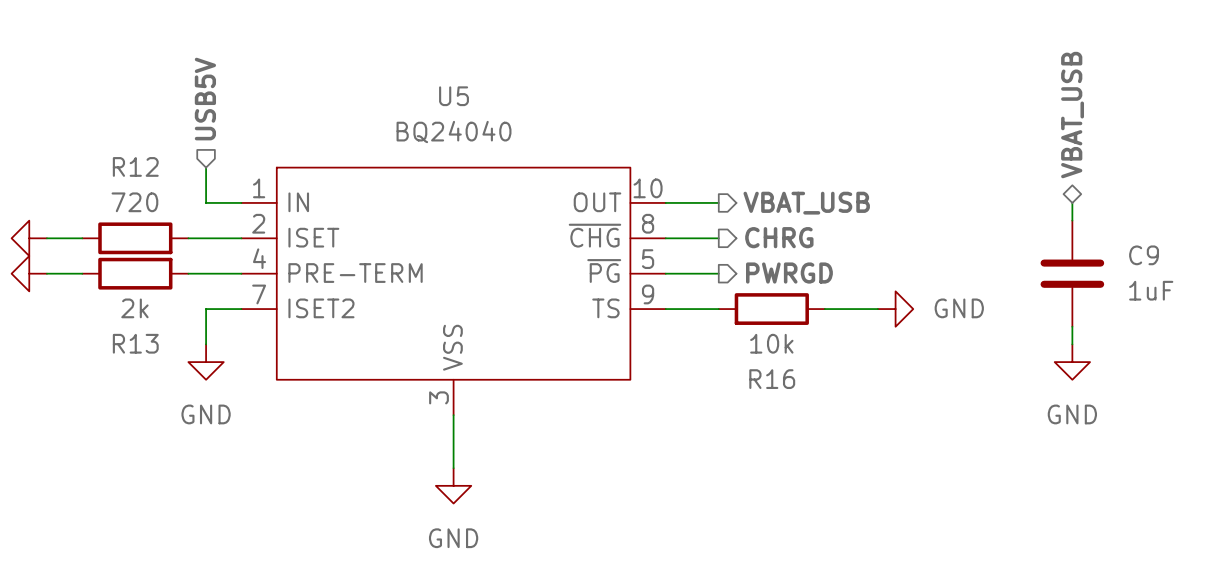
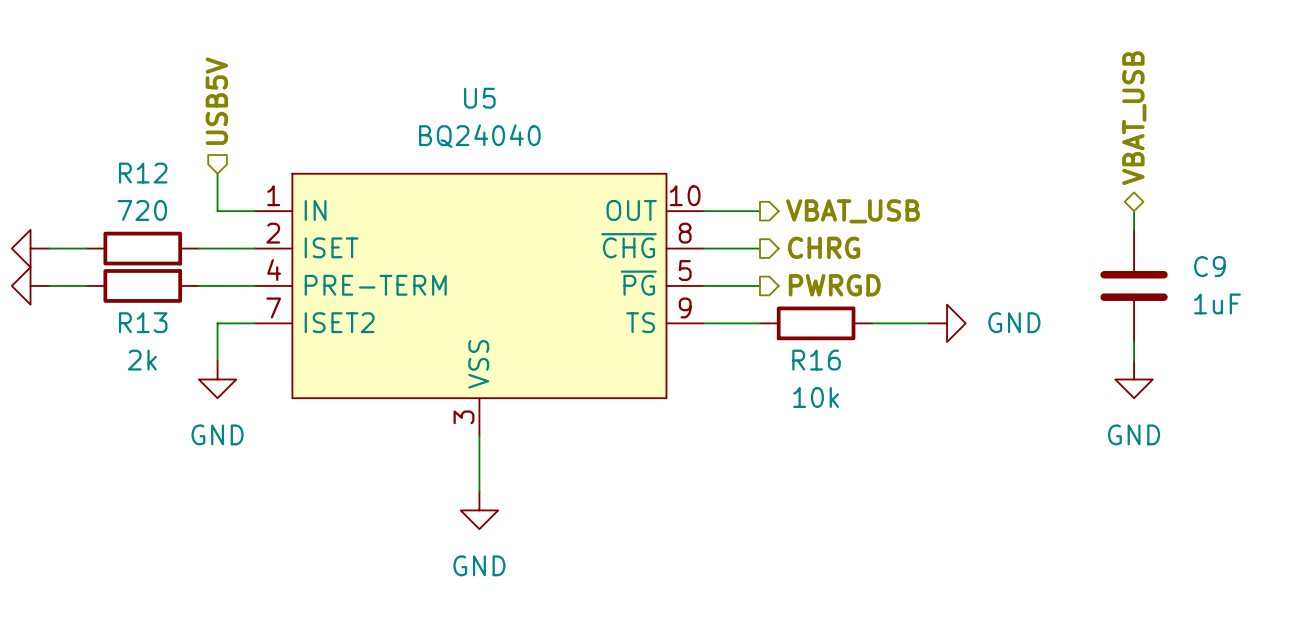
R13 value position: 2k (134, 308) -> 2k (142, 360)
R13 name position: R13 (135, 343) -> R13 (143, 322)
R16 value position: 10k (771, 343) -> 10k (816, 397)
R16 name position: R16 (772, 379) -> R16 (816, 360)

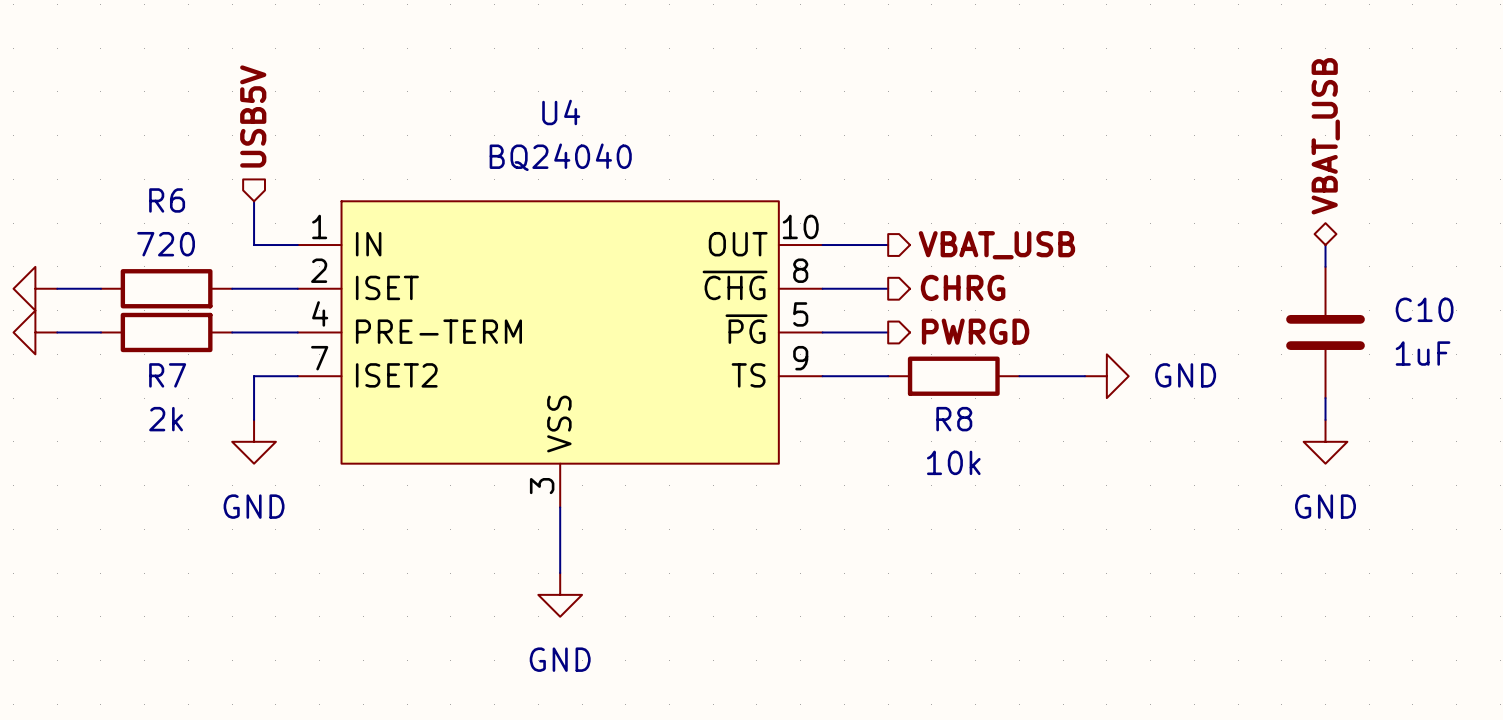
U5 name: U5 (479, 98) -> U4 (561, 112)
R12 name: R12 (143, 173) -> R6 (167, 200)
C9 name: C9 (1209, 266) -> C10 (1424, 309)
R13 name: R13 (143, 322) -> R7 (167, 375)
R16 name: R16 (816, 360) -> R8 (954, 419)

